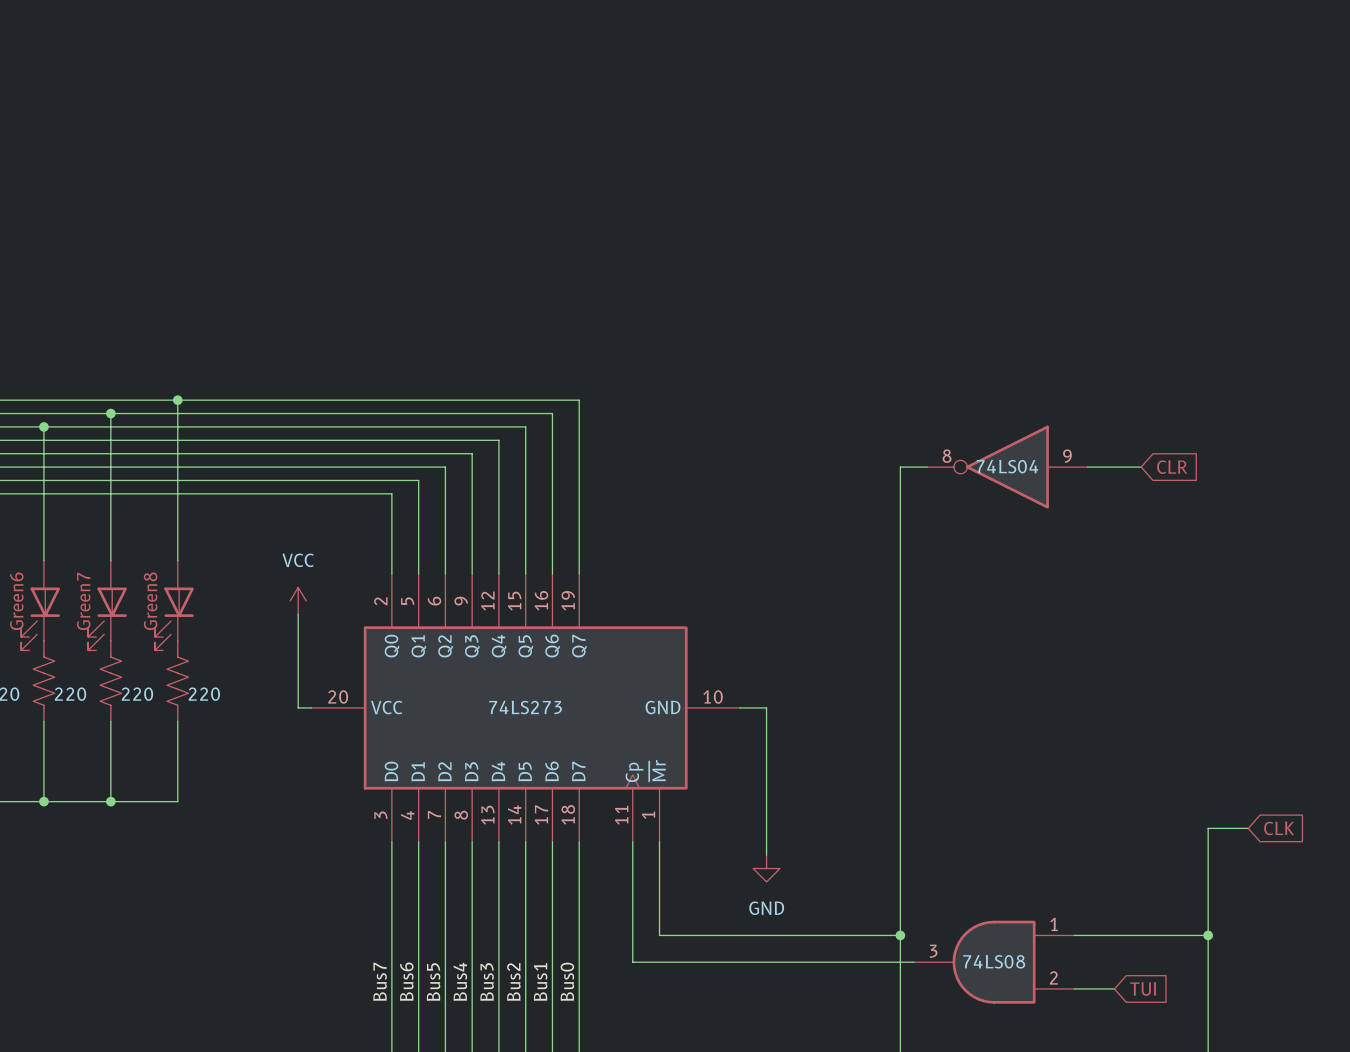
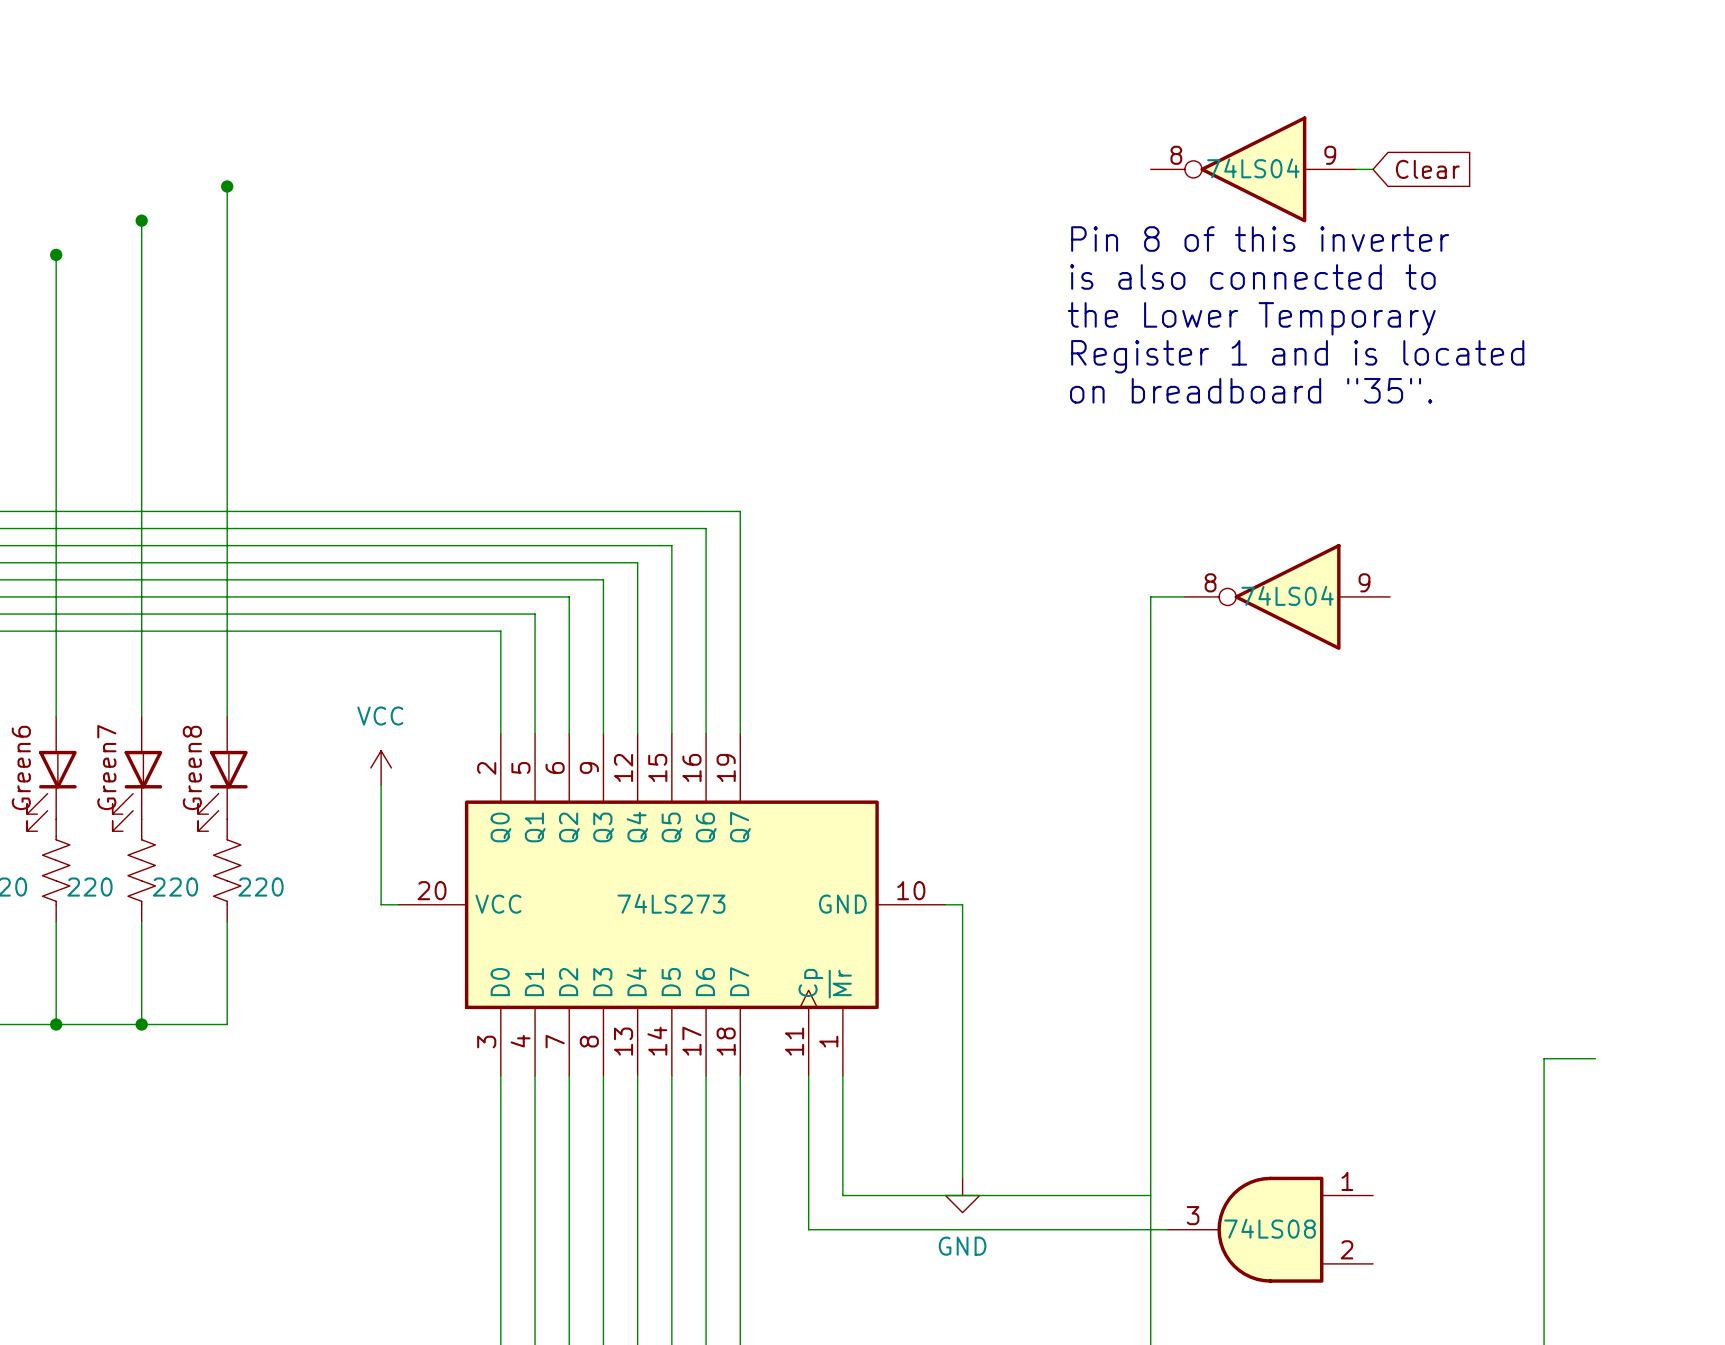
part: none -> 74LS04 (1253, 169)
wire: none -> (1355, 169) (1373, 169)
global label: none -> Clear (1427, 169)
wire: none -> (227, 186) (227, 511)
junction: none -> (227, 186)
wire: none -> (141, 220) (141, 528)
junction: none -> (141, 220)
text: none -> Pin 8 of this inverter (1260, 239)
wire: none -> (56, 254) (56, 545)
junction: none -> (56, 254)
text: none -> is also connected to (1252, 276)
text: none -> the Lower Temporary (1251, 318)
text: none -> Register 1 and is located (1297, 356)
text: none -> on breadboard "35". (1251, 390)
junction: (177, 400) -> none
junction: (110, 413) -> none
junction: (43, 426) -> none
wire: (1087, 467) (1141, 467) -> none
global label: CLR (1172, 467) -> none
wire: (753, 707) (766, 707) (766, 855) -> (962, 904) (962, 1178)
global label: CLK (1279, 828) -> none
power symbol position: GND (766, 868) -> GND (962, 1195)
junction: (900, 935) -> none
wire: (1074, 935) (1208, 935) -> none
junction: (1208, 935) -> none
label: Bus7 (380, 981) -> none
label: Bus6 (406, 981) -> none
label: Bus4 (460, 981) -> none
label: Bus0 (567, 981) -> none
label: Bus5 (433, 982) -> none
label: Bus3 (487, 982) -> none
label: Bus2 (513, 982) -> none
label: Bus1 (540, 982) -> none
wire: (1074, 988) (1114, 988) -> none
global label: TUI (1143, 989) -> none

